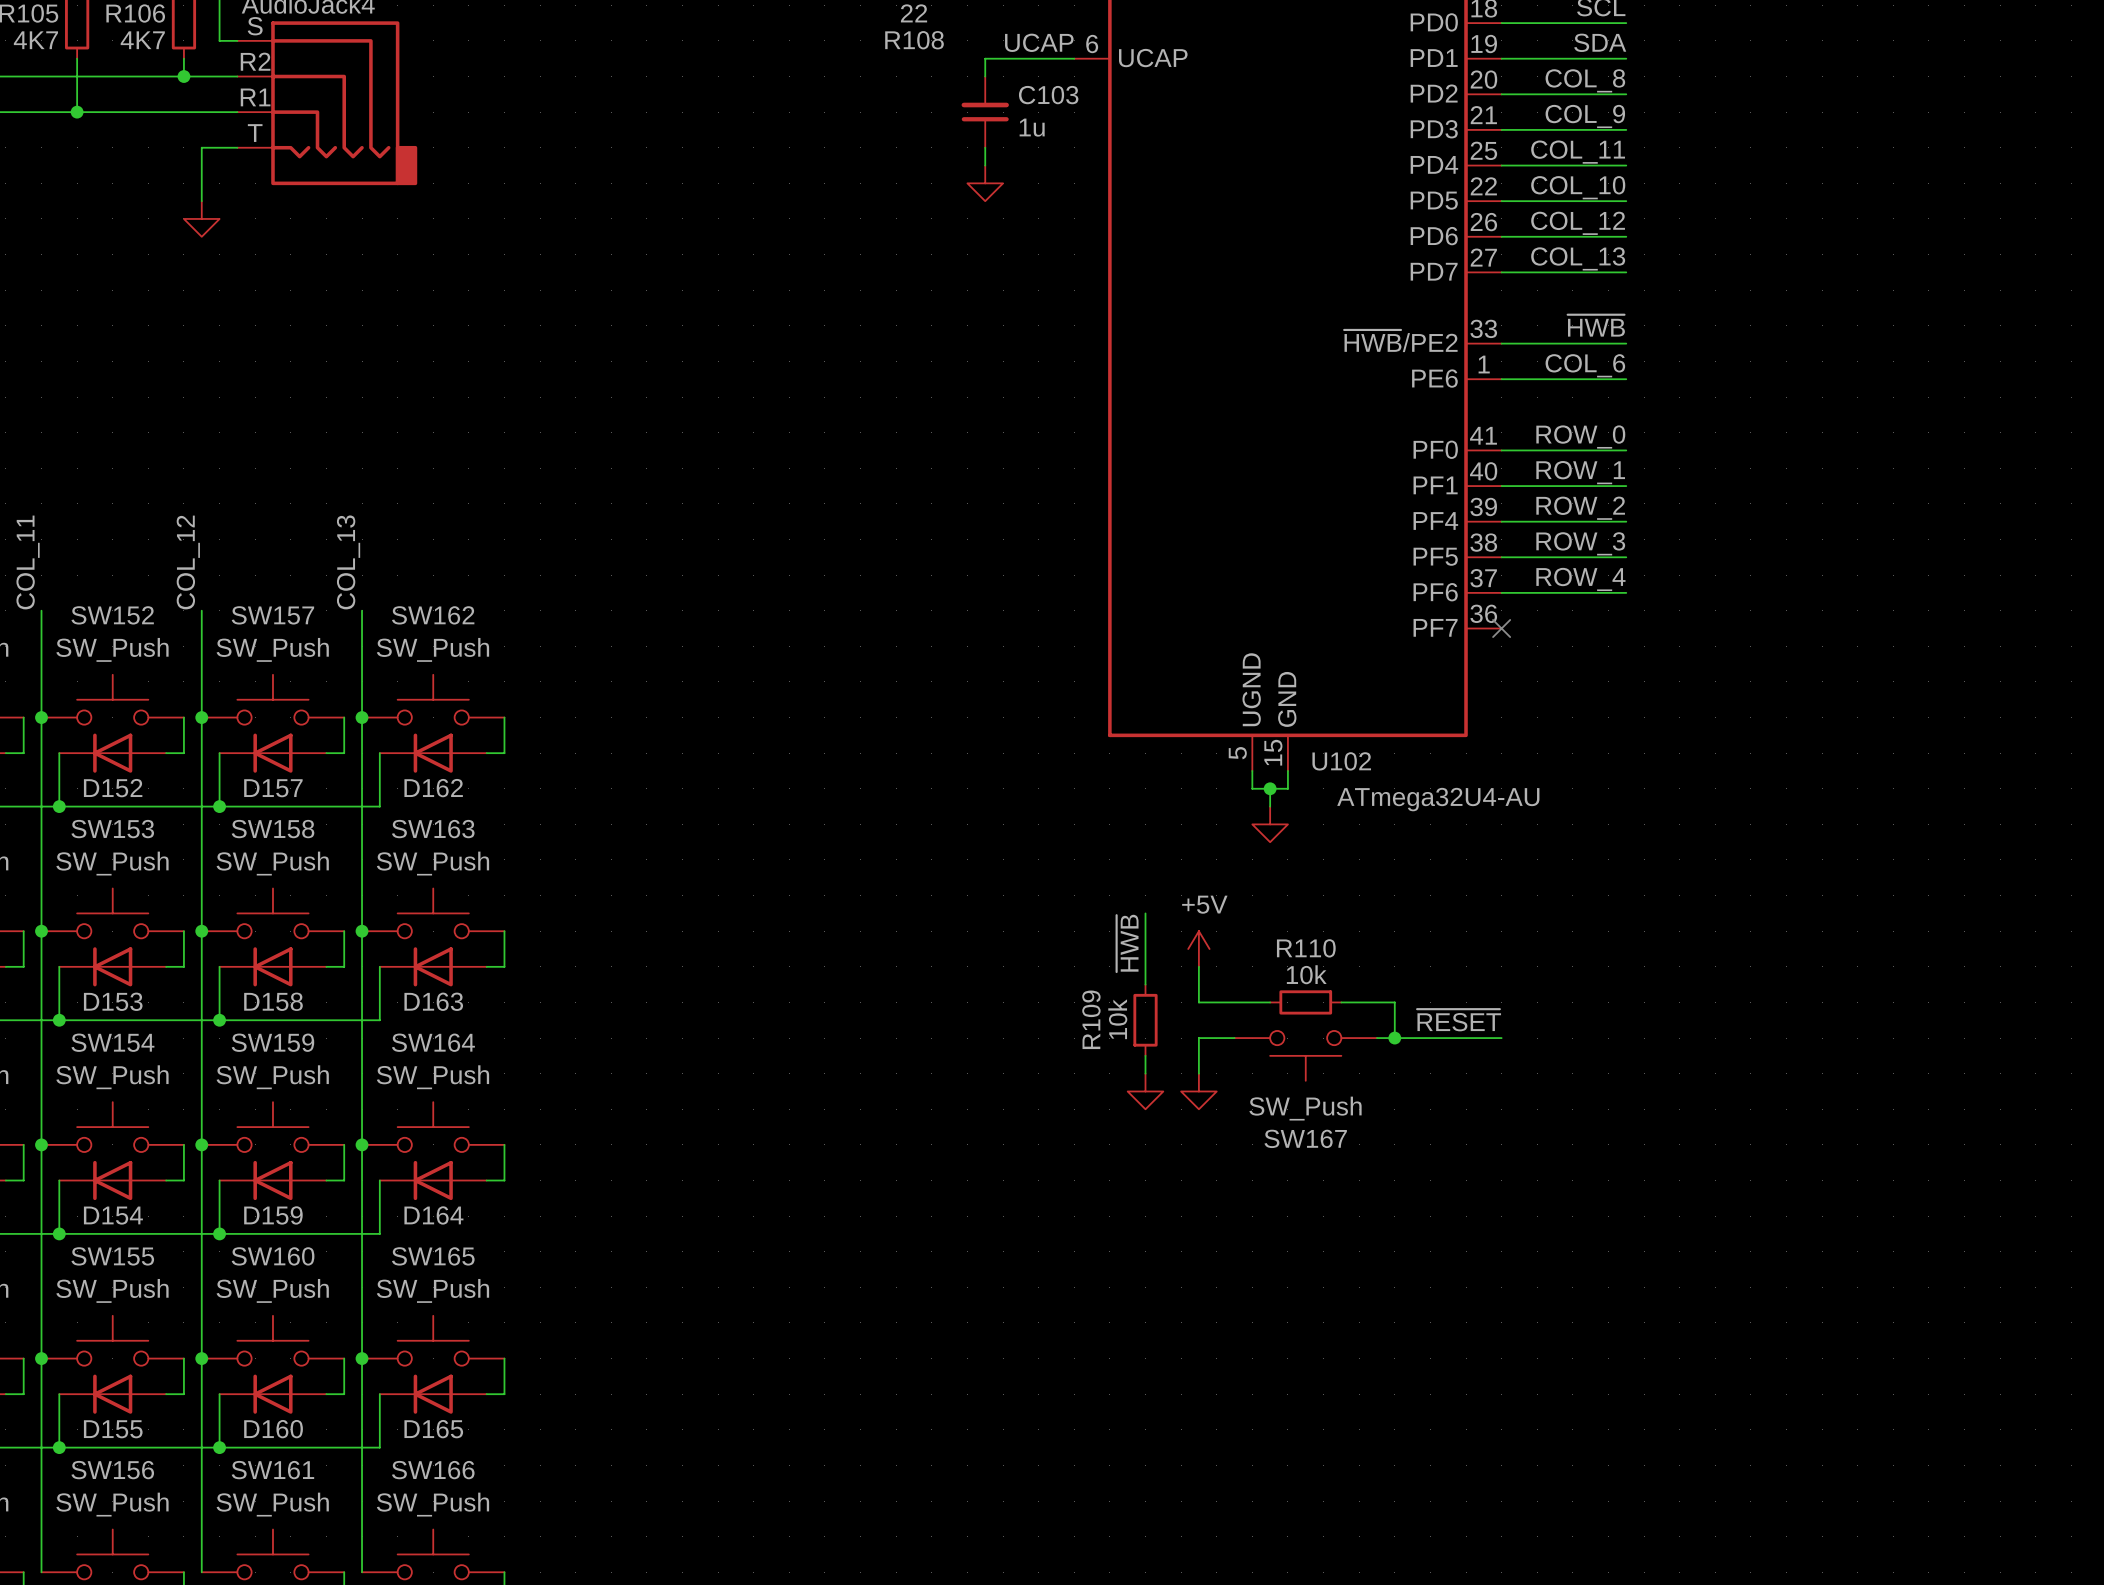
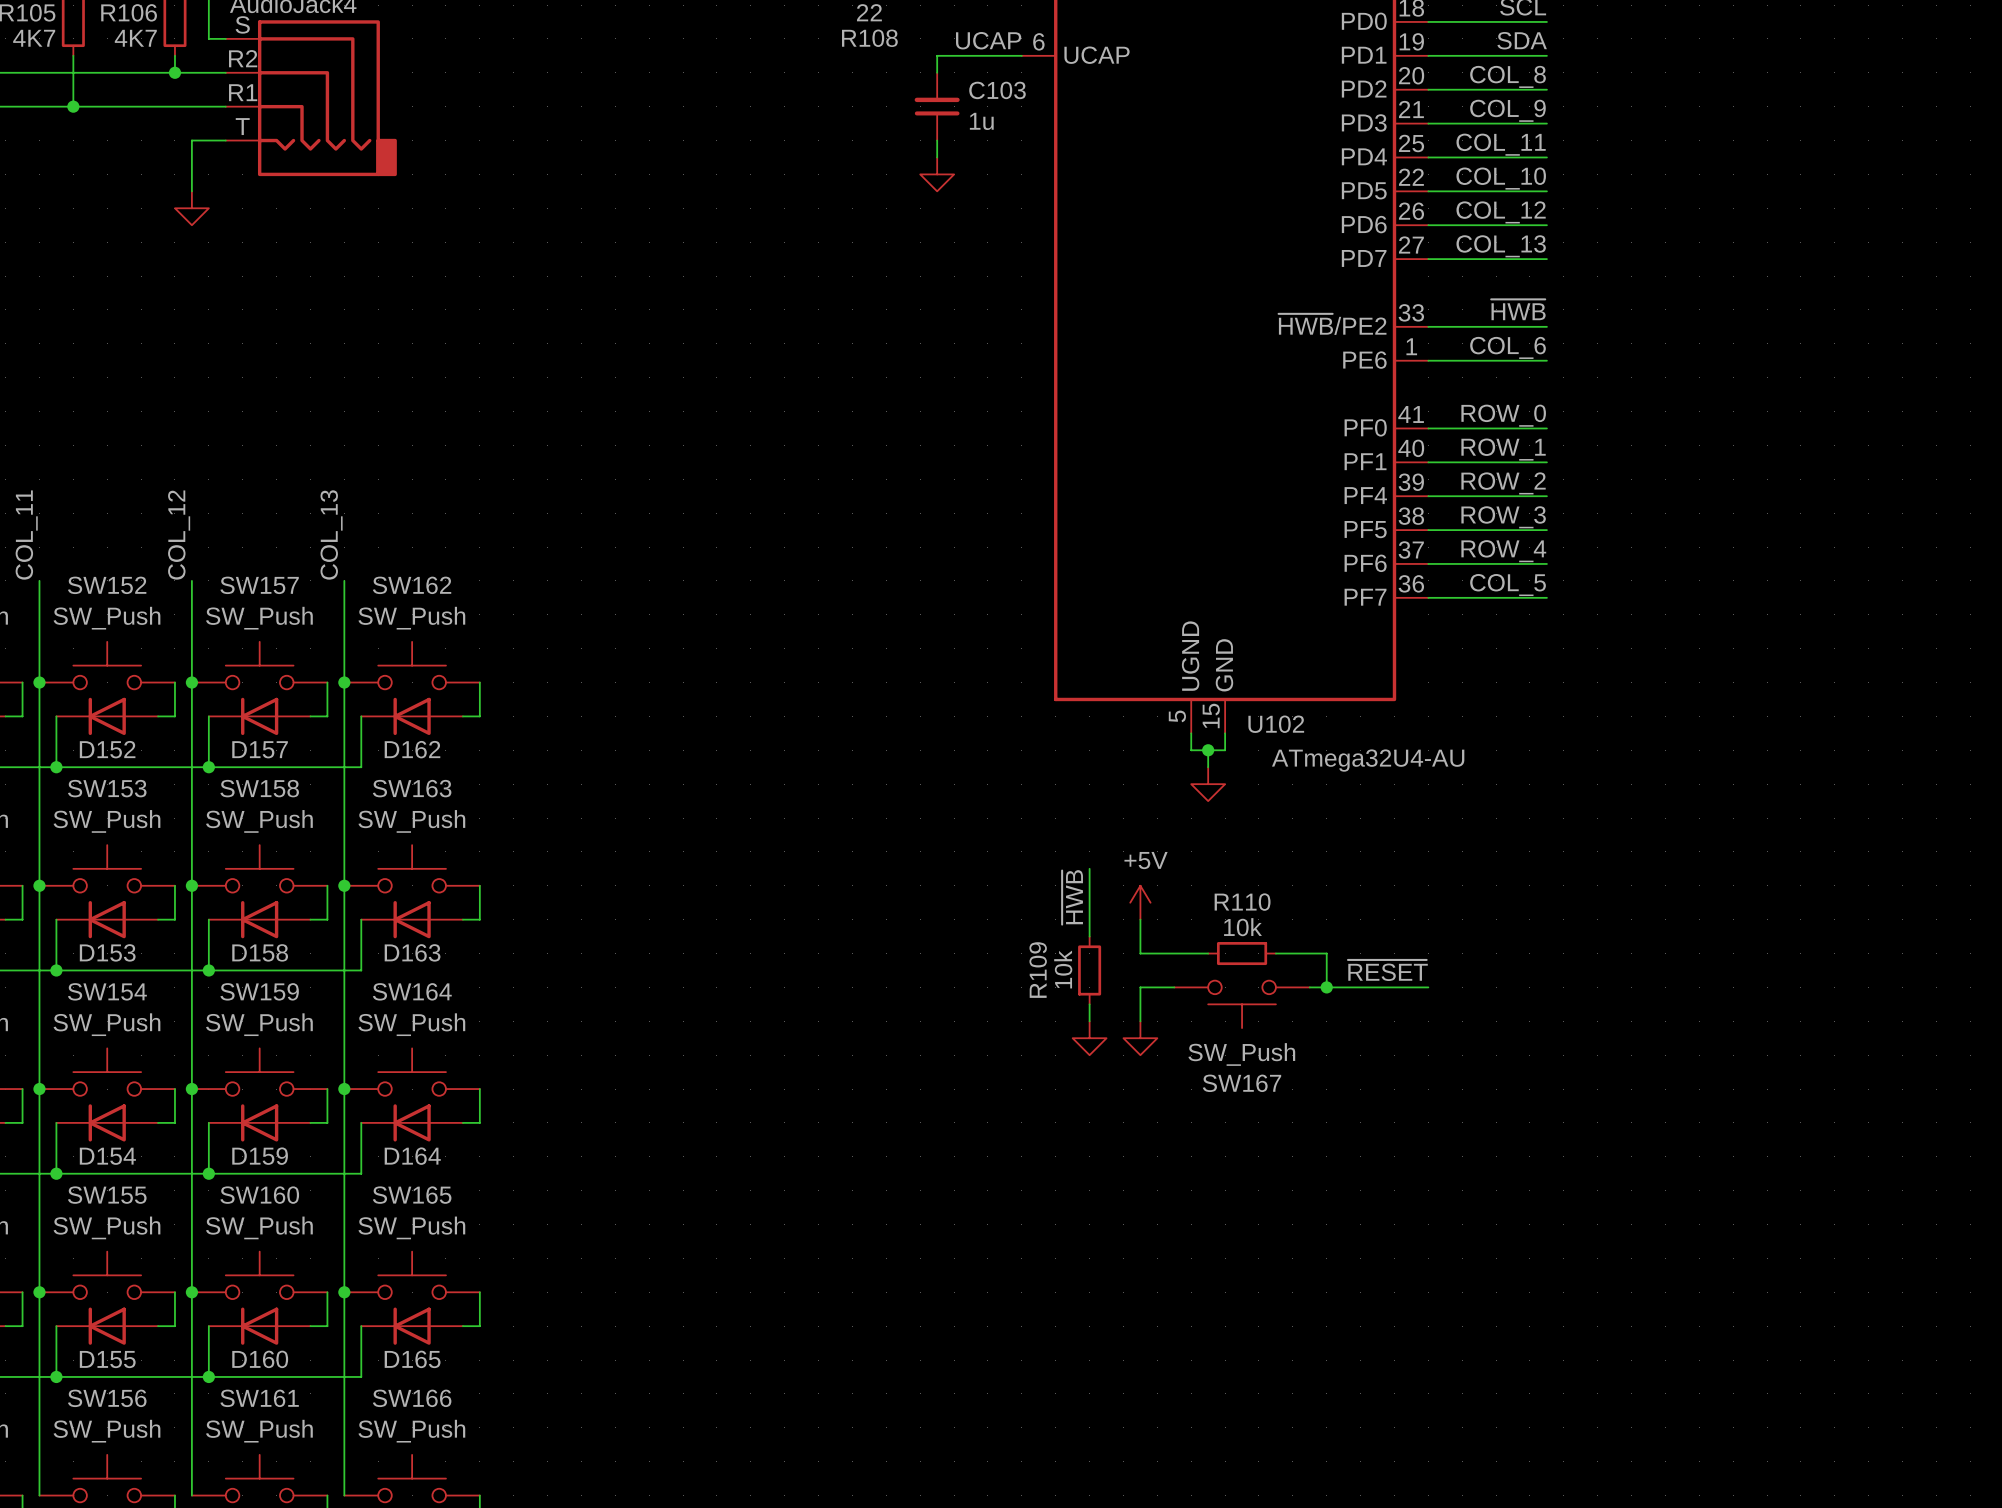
label: none -> COL_5 (1508, 585)
wire: none -> (1428, 597) (1546, 597)
no-connect mark: (1501, 628) -> none

